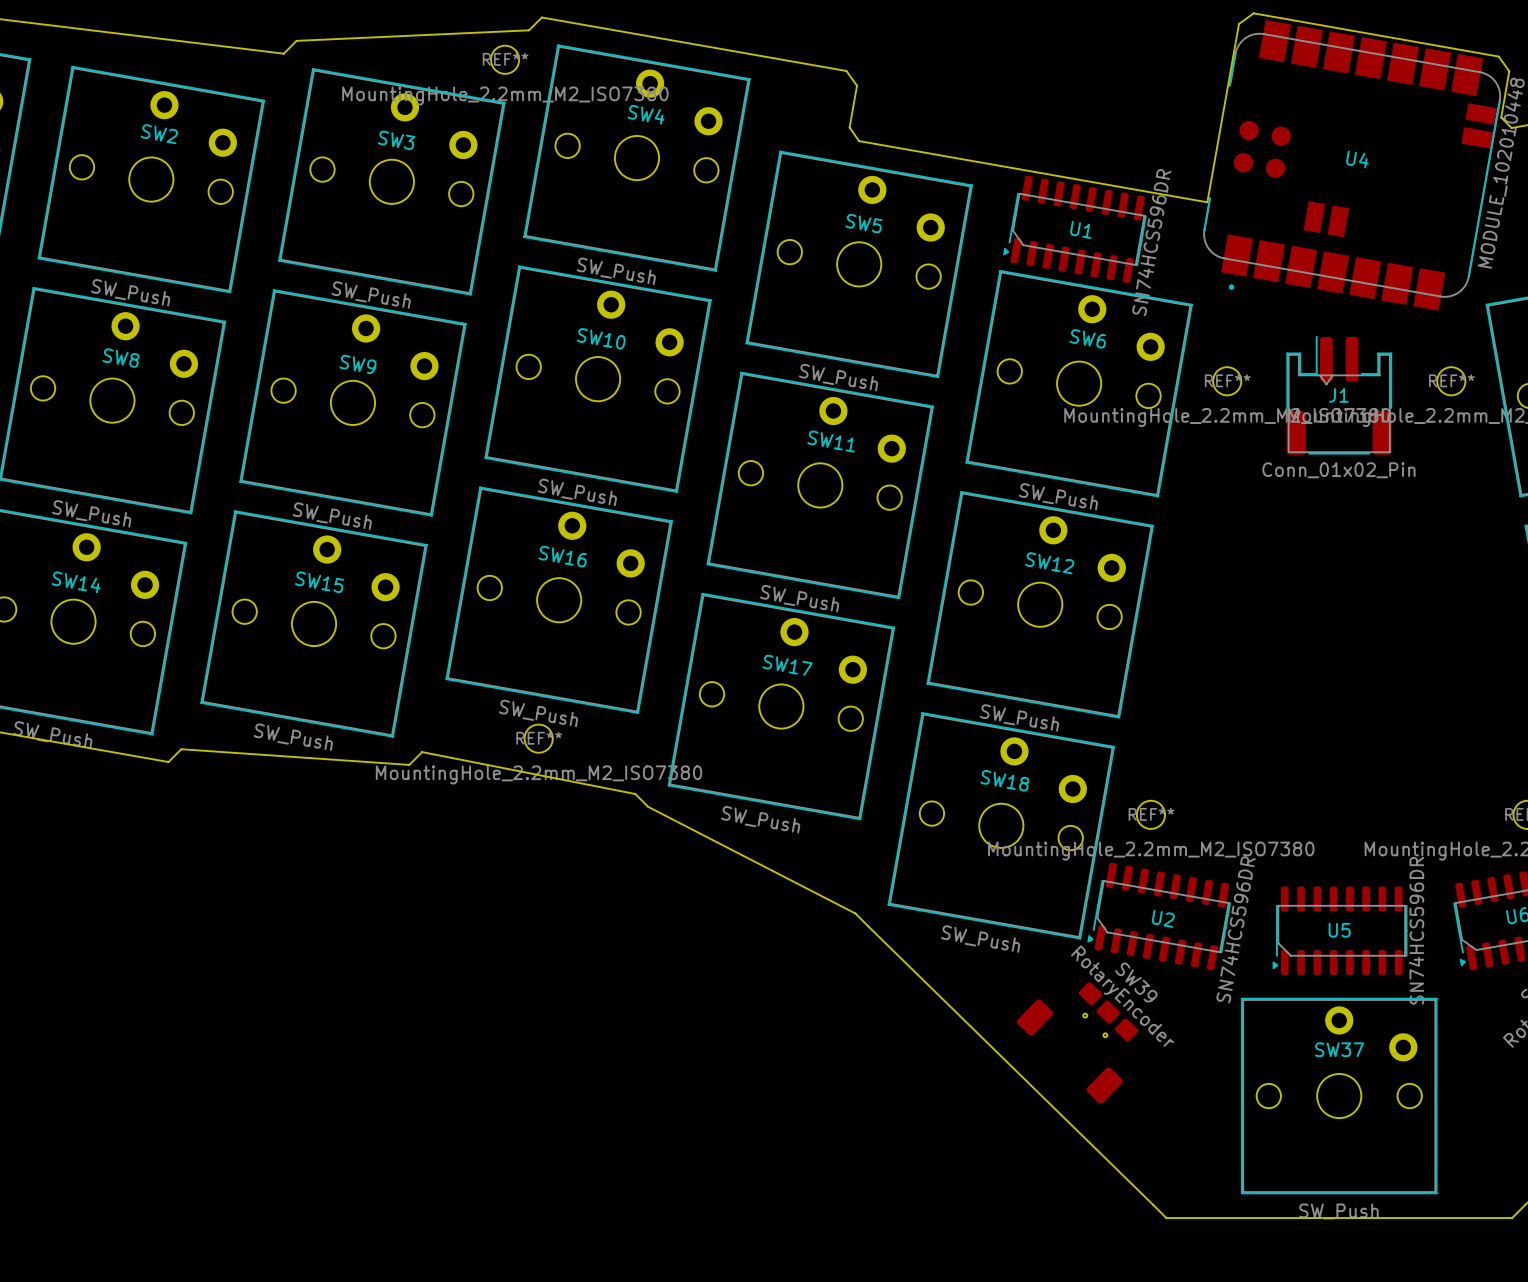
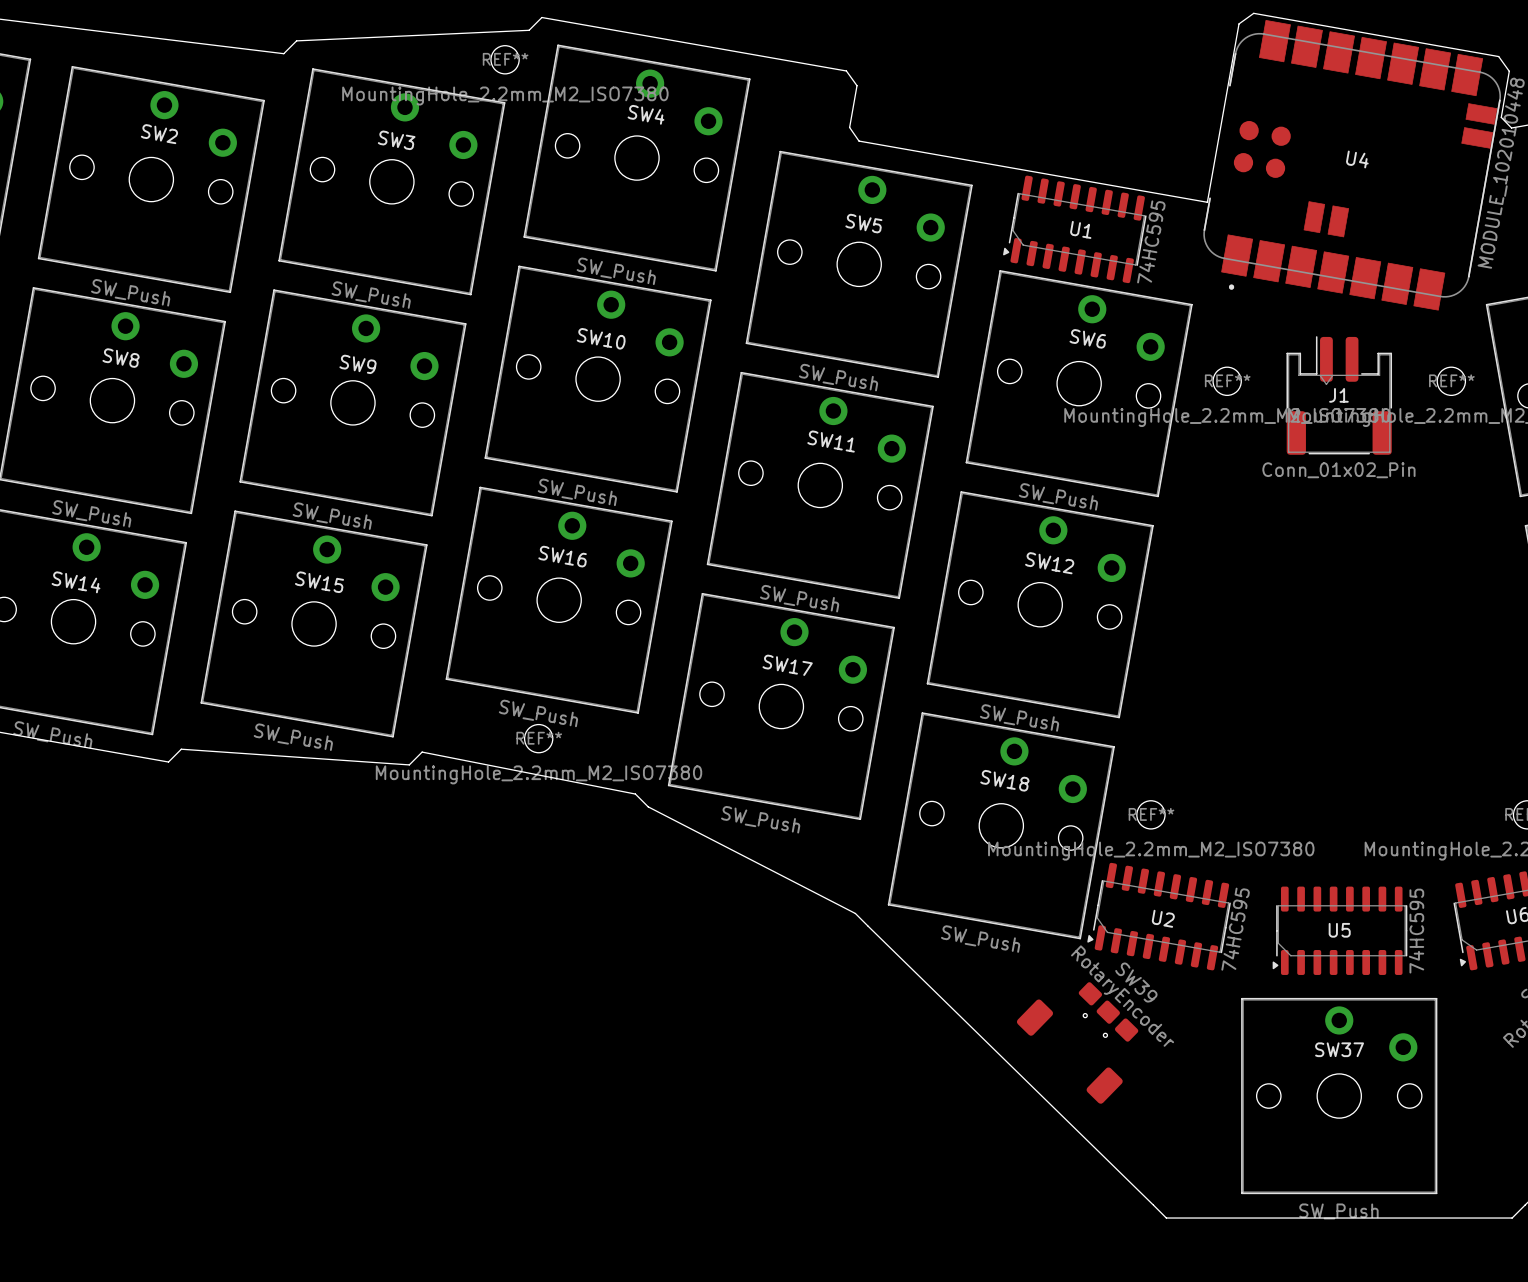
U1 value: SN74HCS596DR (1151, 242) -> 74HC595 (1151, 241)
U2 value: SN74HCS596DR (1236, 929) -> 74HC595 (1235, 929)
U5 value: SN74HCS596DR (1416, 930) -> 74HC595 (1416, 931)

